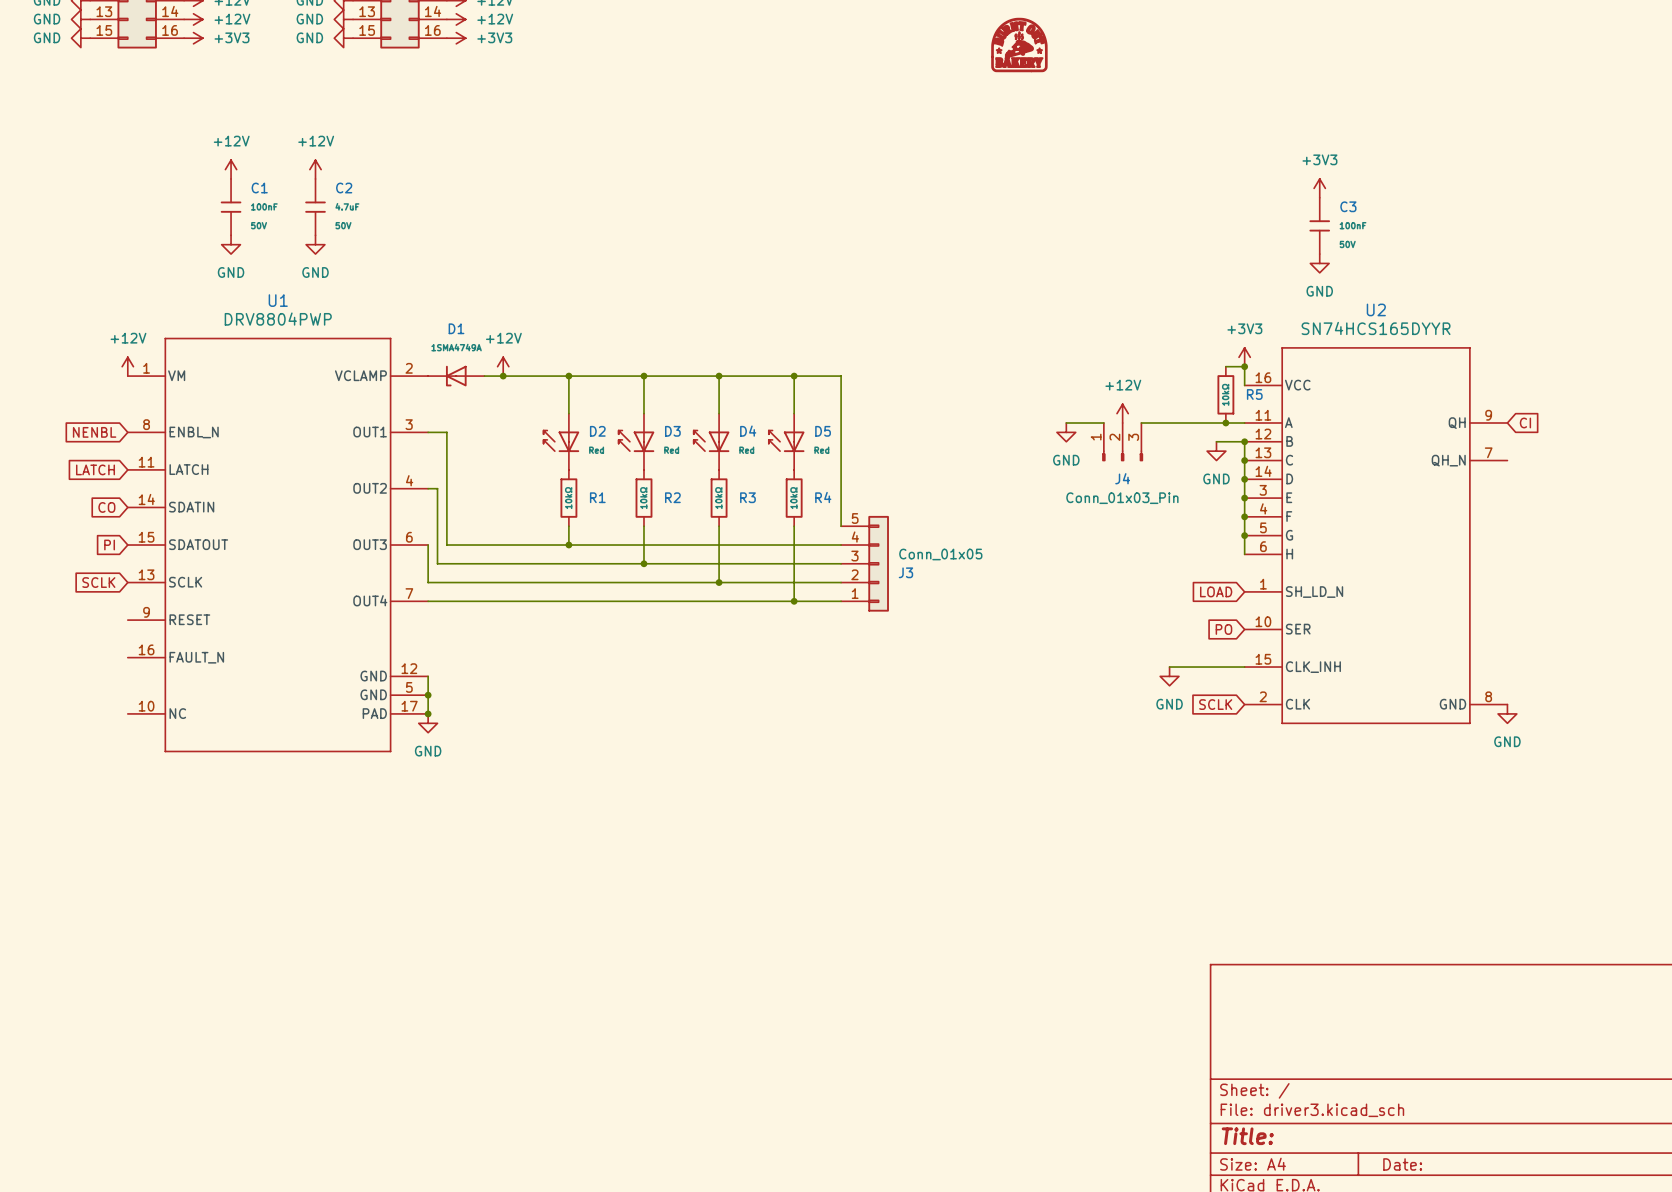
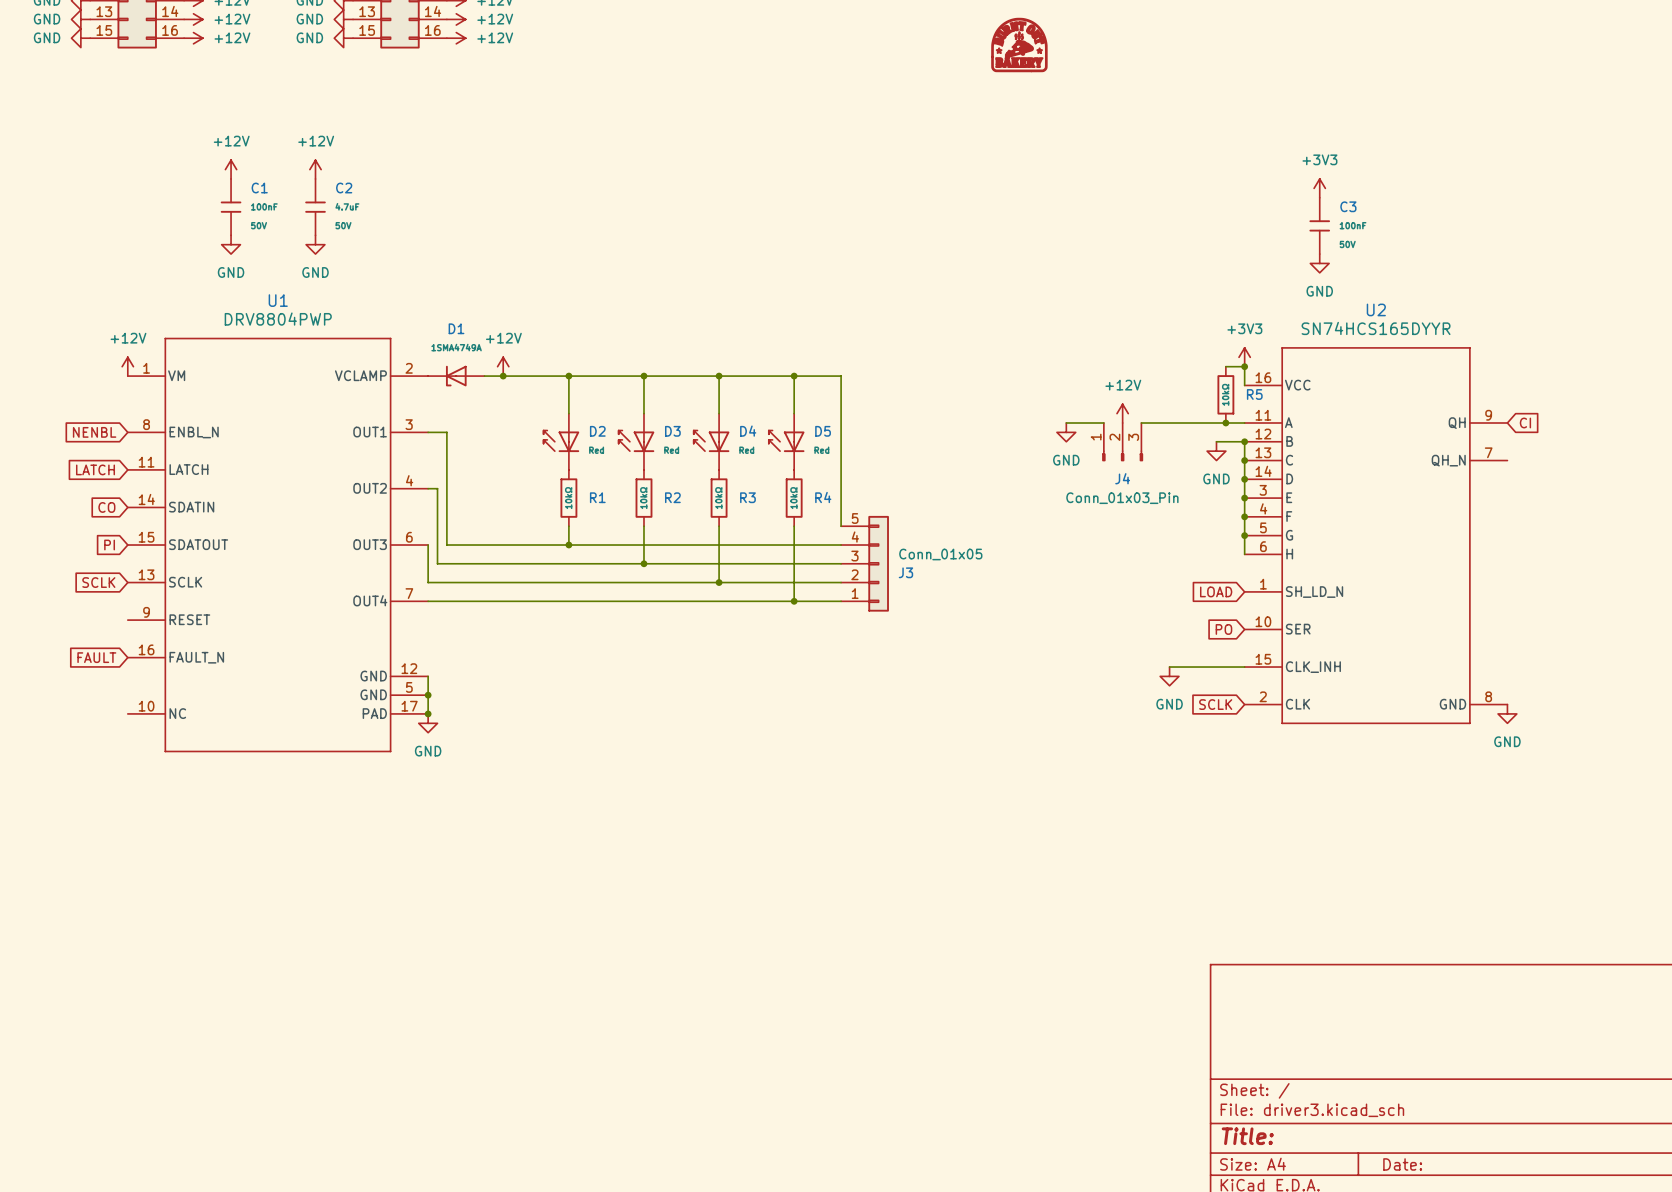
power symbol: +3V3 (193, 38) -> +12V (193, 38)
power symbol: +3V3 (456, 38) -> +12V (456, 38)
global label: none -> FAULT (96, 657)

